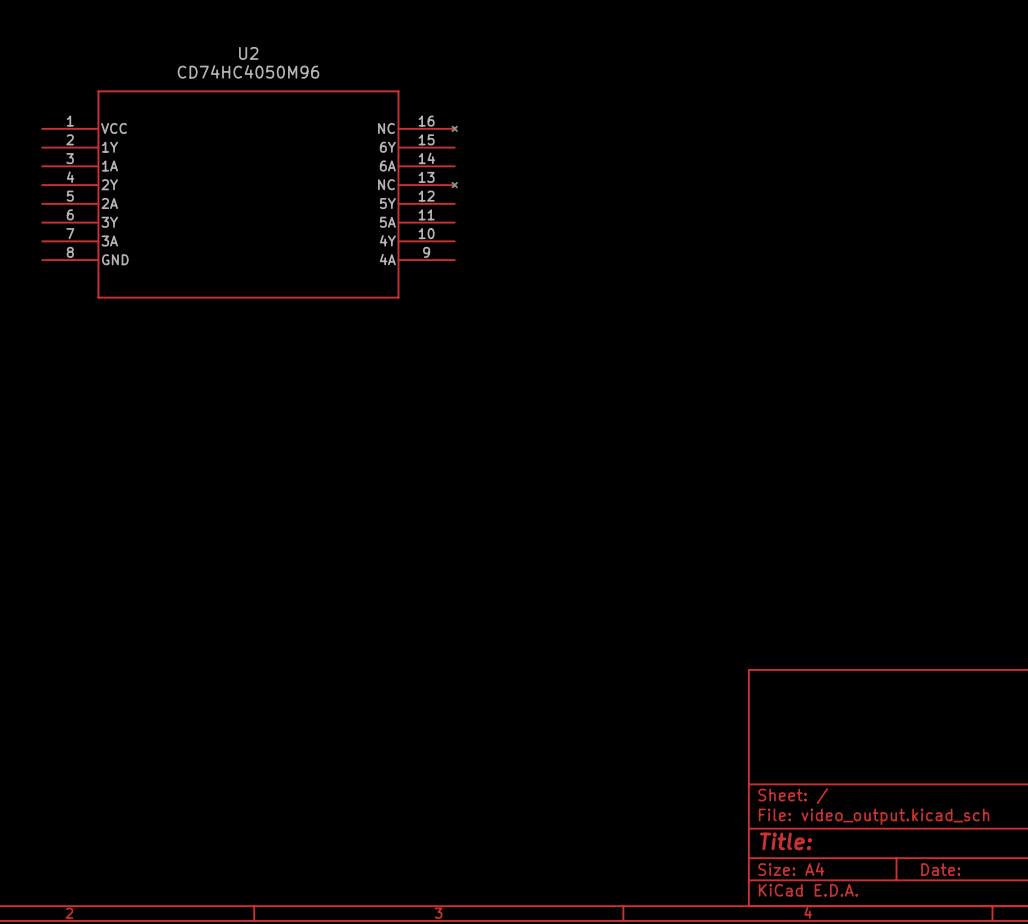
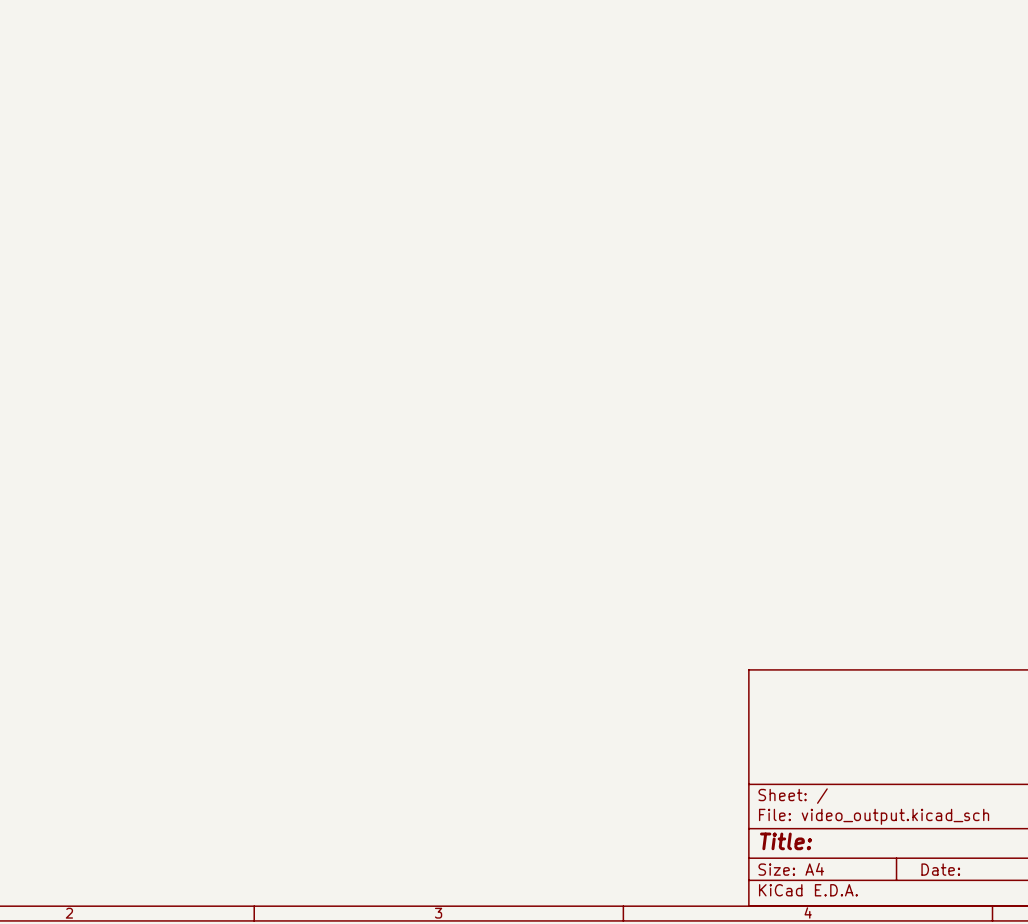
U2: CD74HC4050M96 (249, 194) -> none

